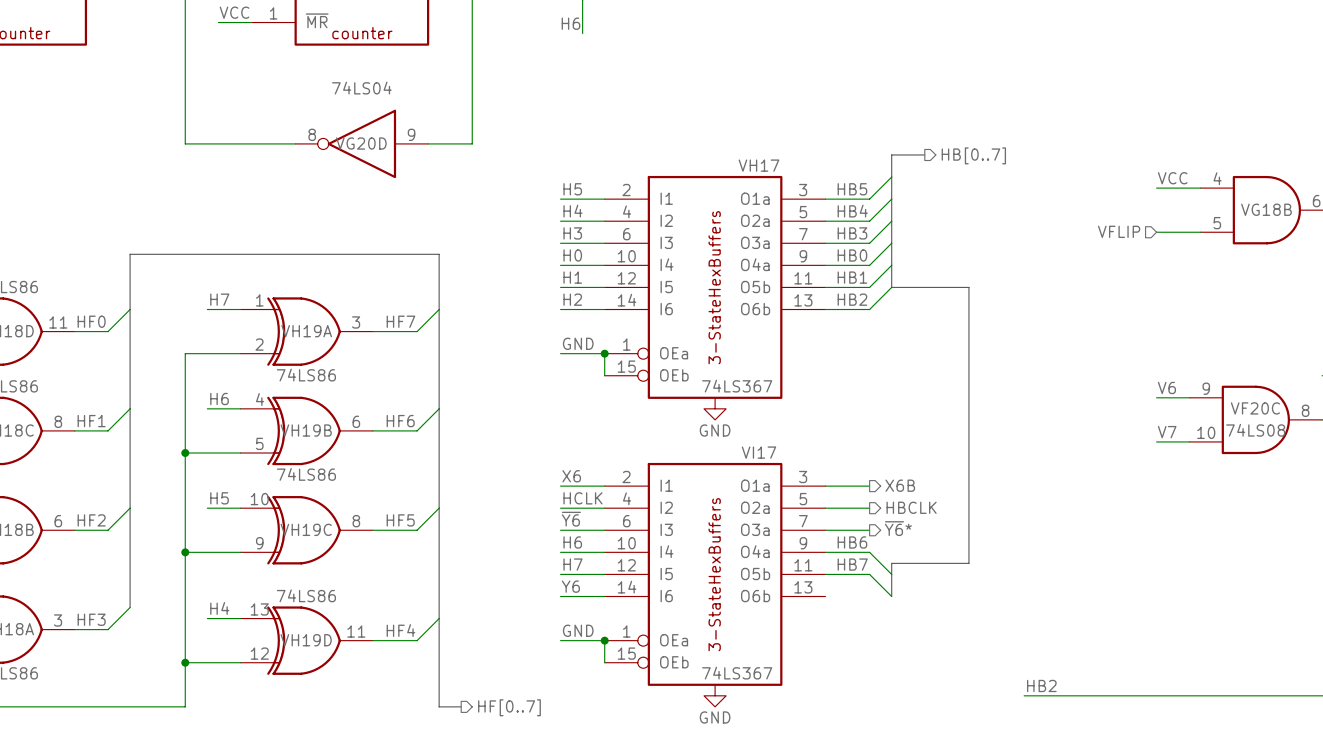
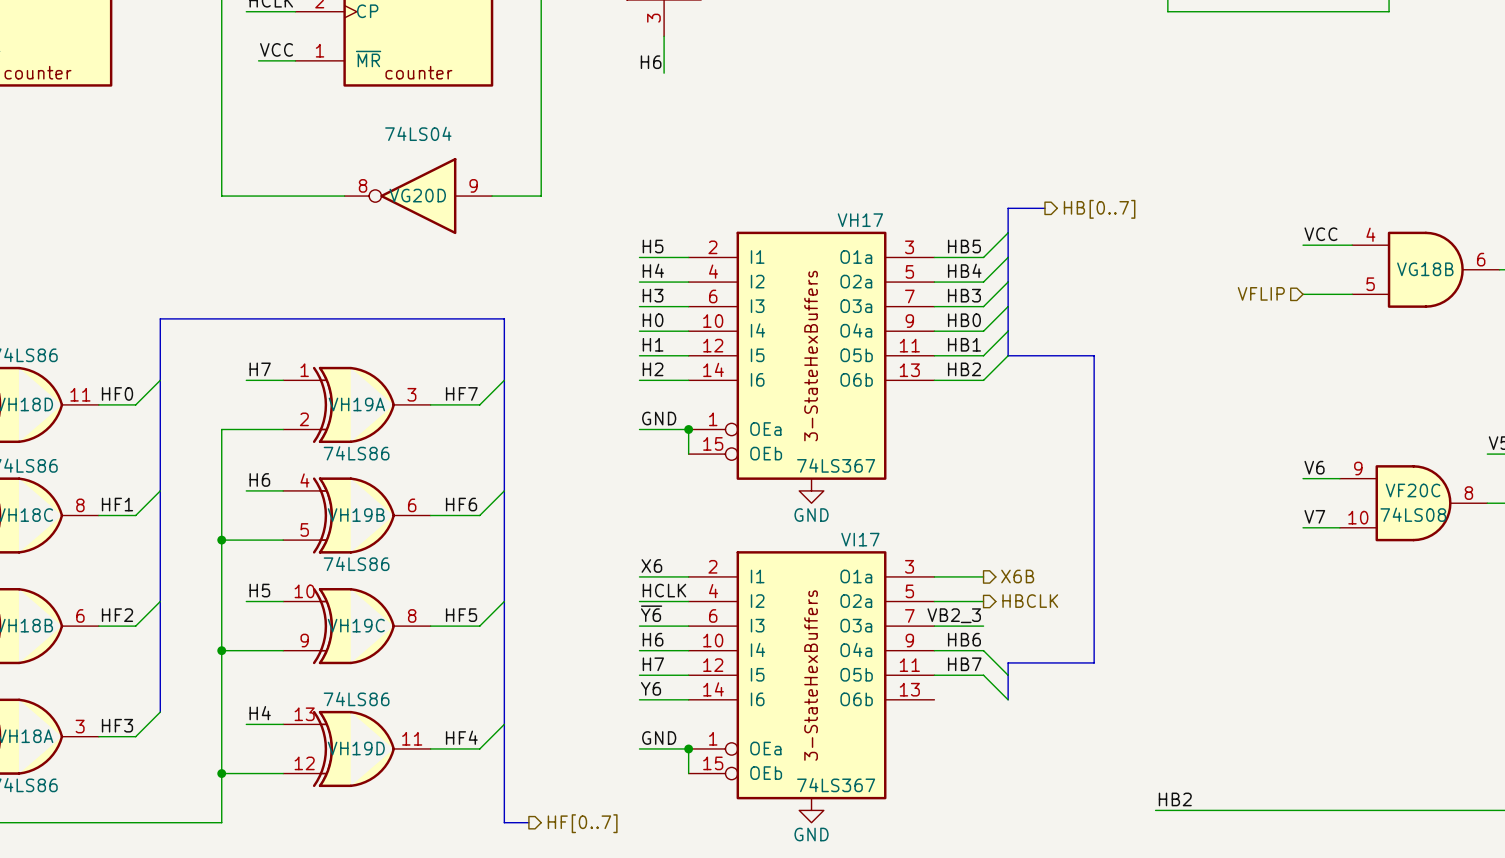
label: none -> VB2_3 (954, 615)
hierarchical label: ~{Y6}* (898, 528) -> none

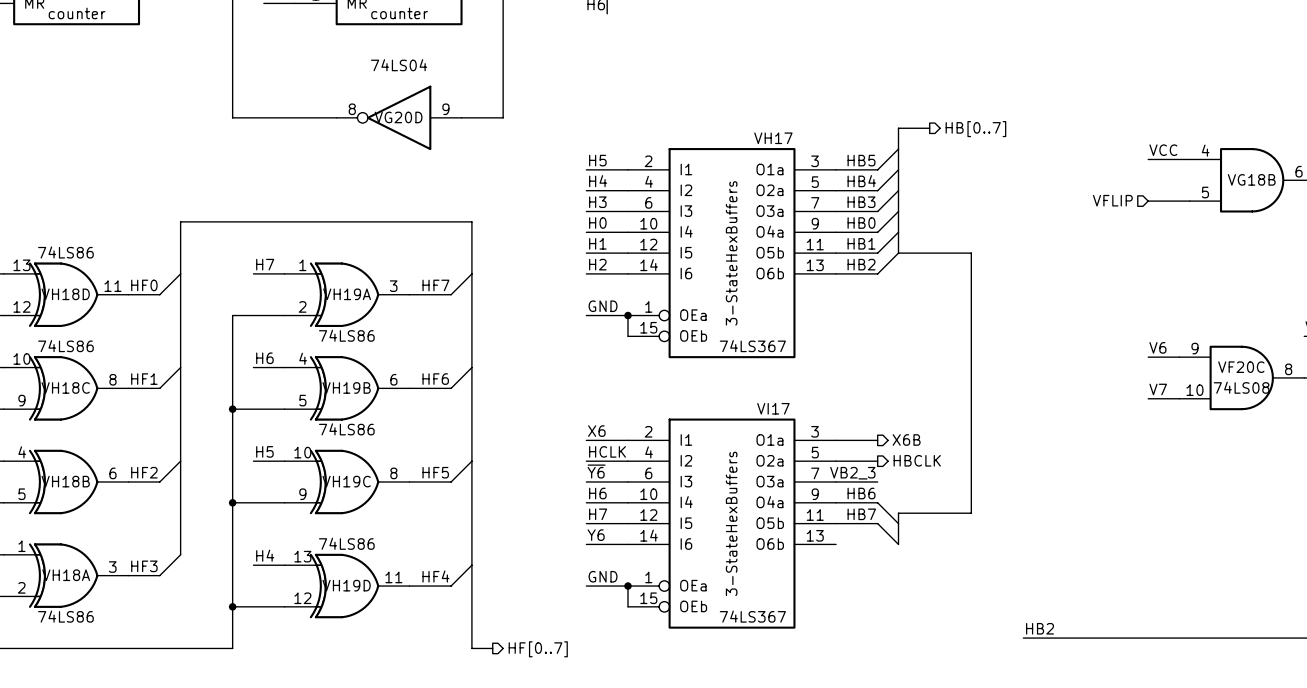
power symbol: GND (811, 490) -> none
power symbol: GND (811, 810) -> none

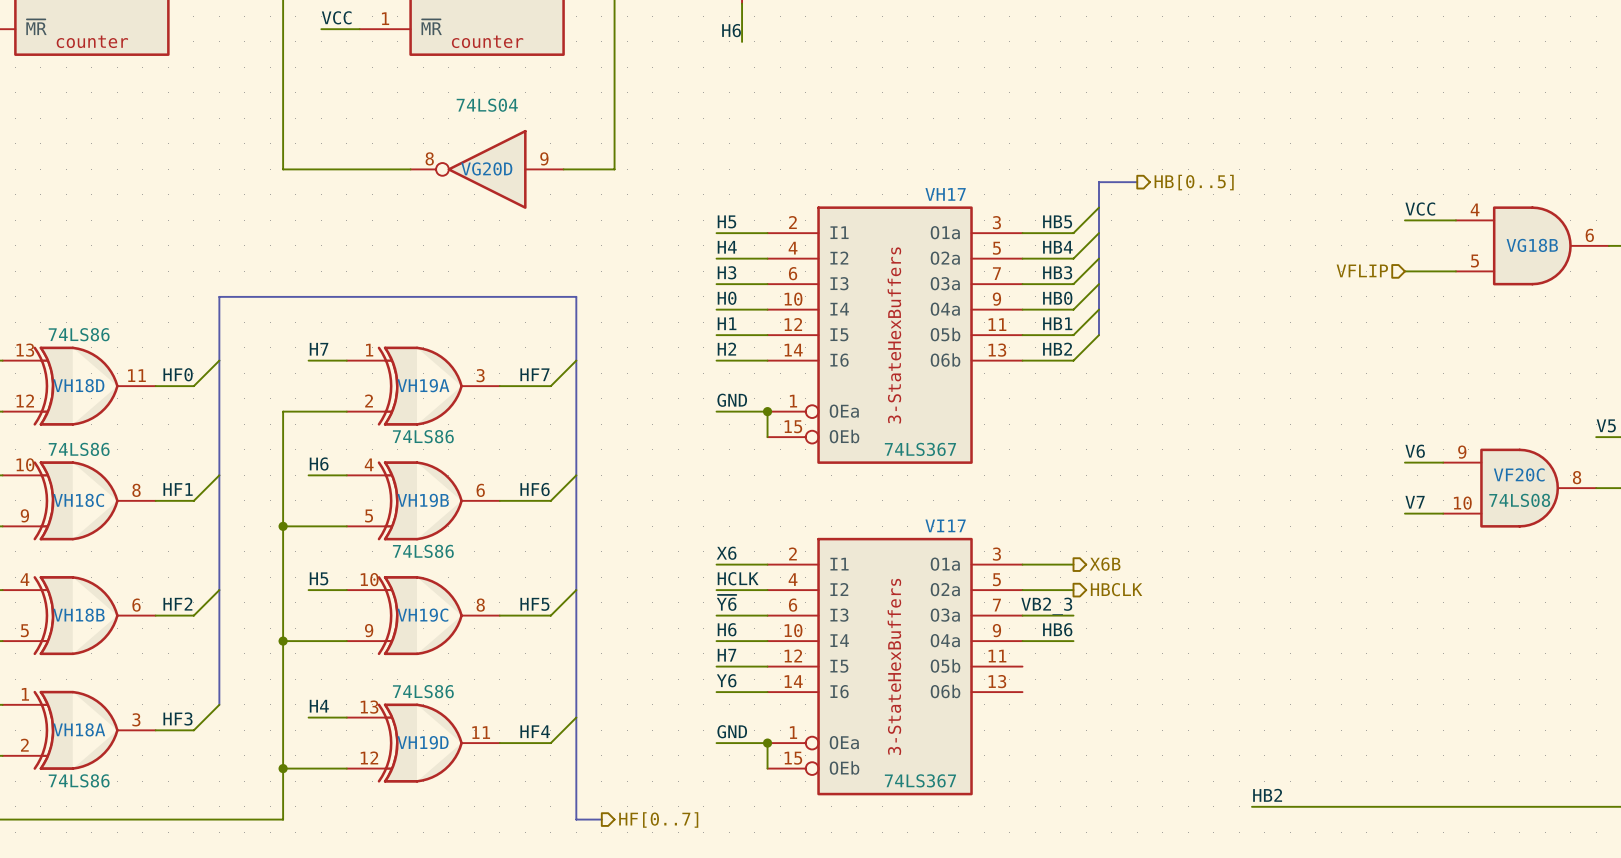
hierarchical label: HB[0..7] (975, 129) -> HB[0..5] (1194, 182)
bus: (898, 253) (971, 253) (971, 513) (898, 513) (898, 544) -> none
wire: (877, 502) (898, 523) -> none
label: HB7 (861, 514) -> none
wire: (836, 523) (877, 523) (898, 544) -> none

